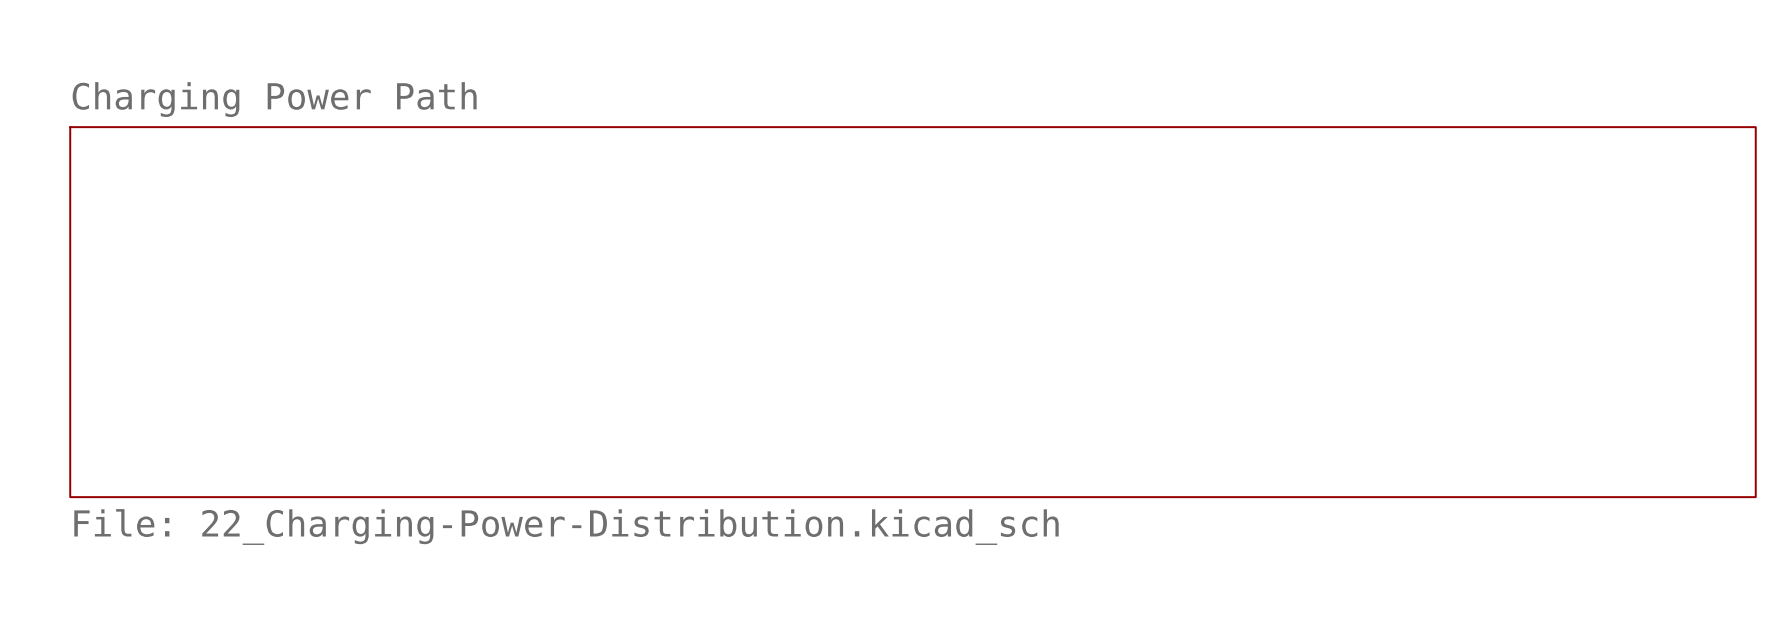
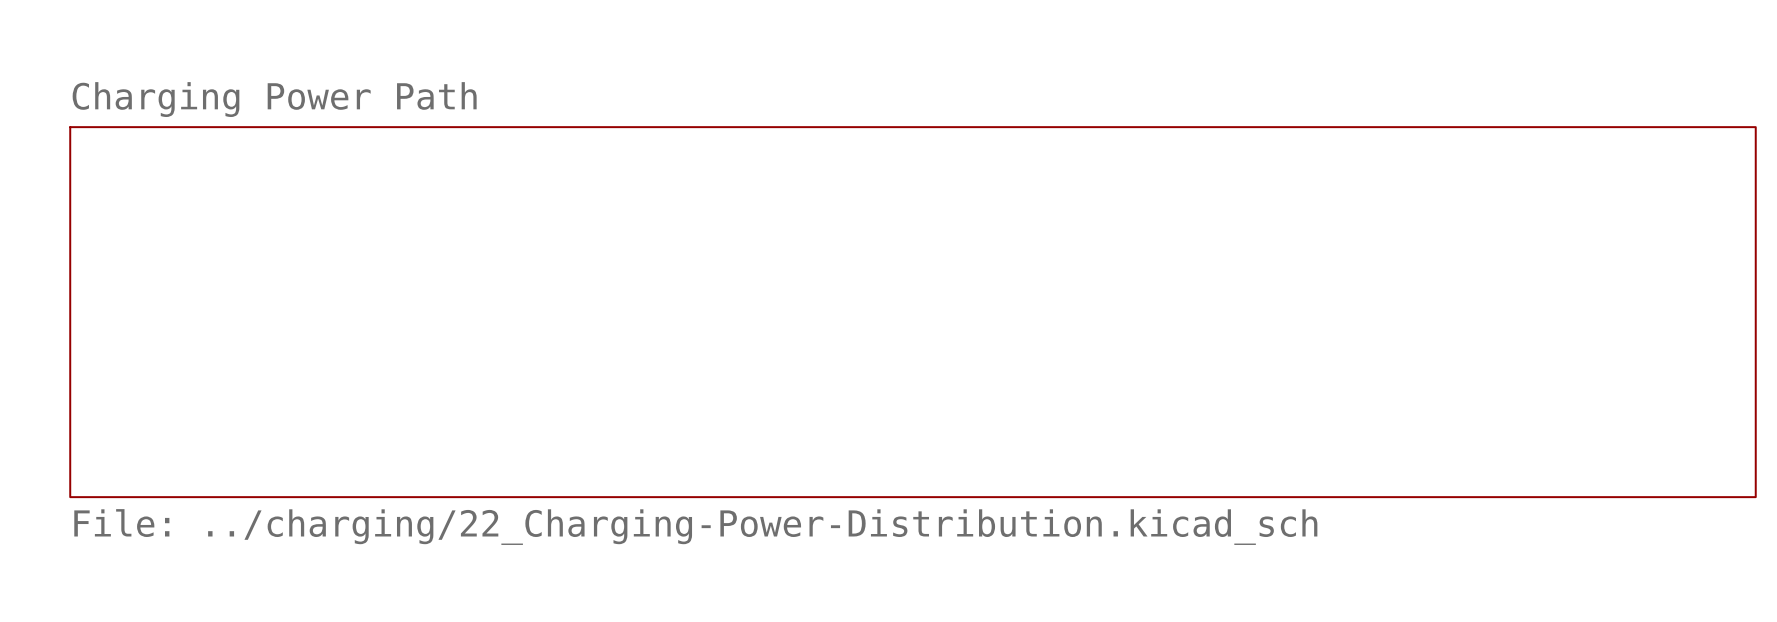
sheet Charging Power Path value: File: 22_Charging-Power-Distribution.kicad_sch (566, 527) -> File: ../charging/22_Charging-Power-Distribution.kicad_sch (695, 527)

